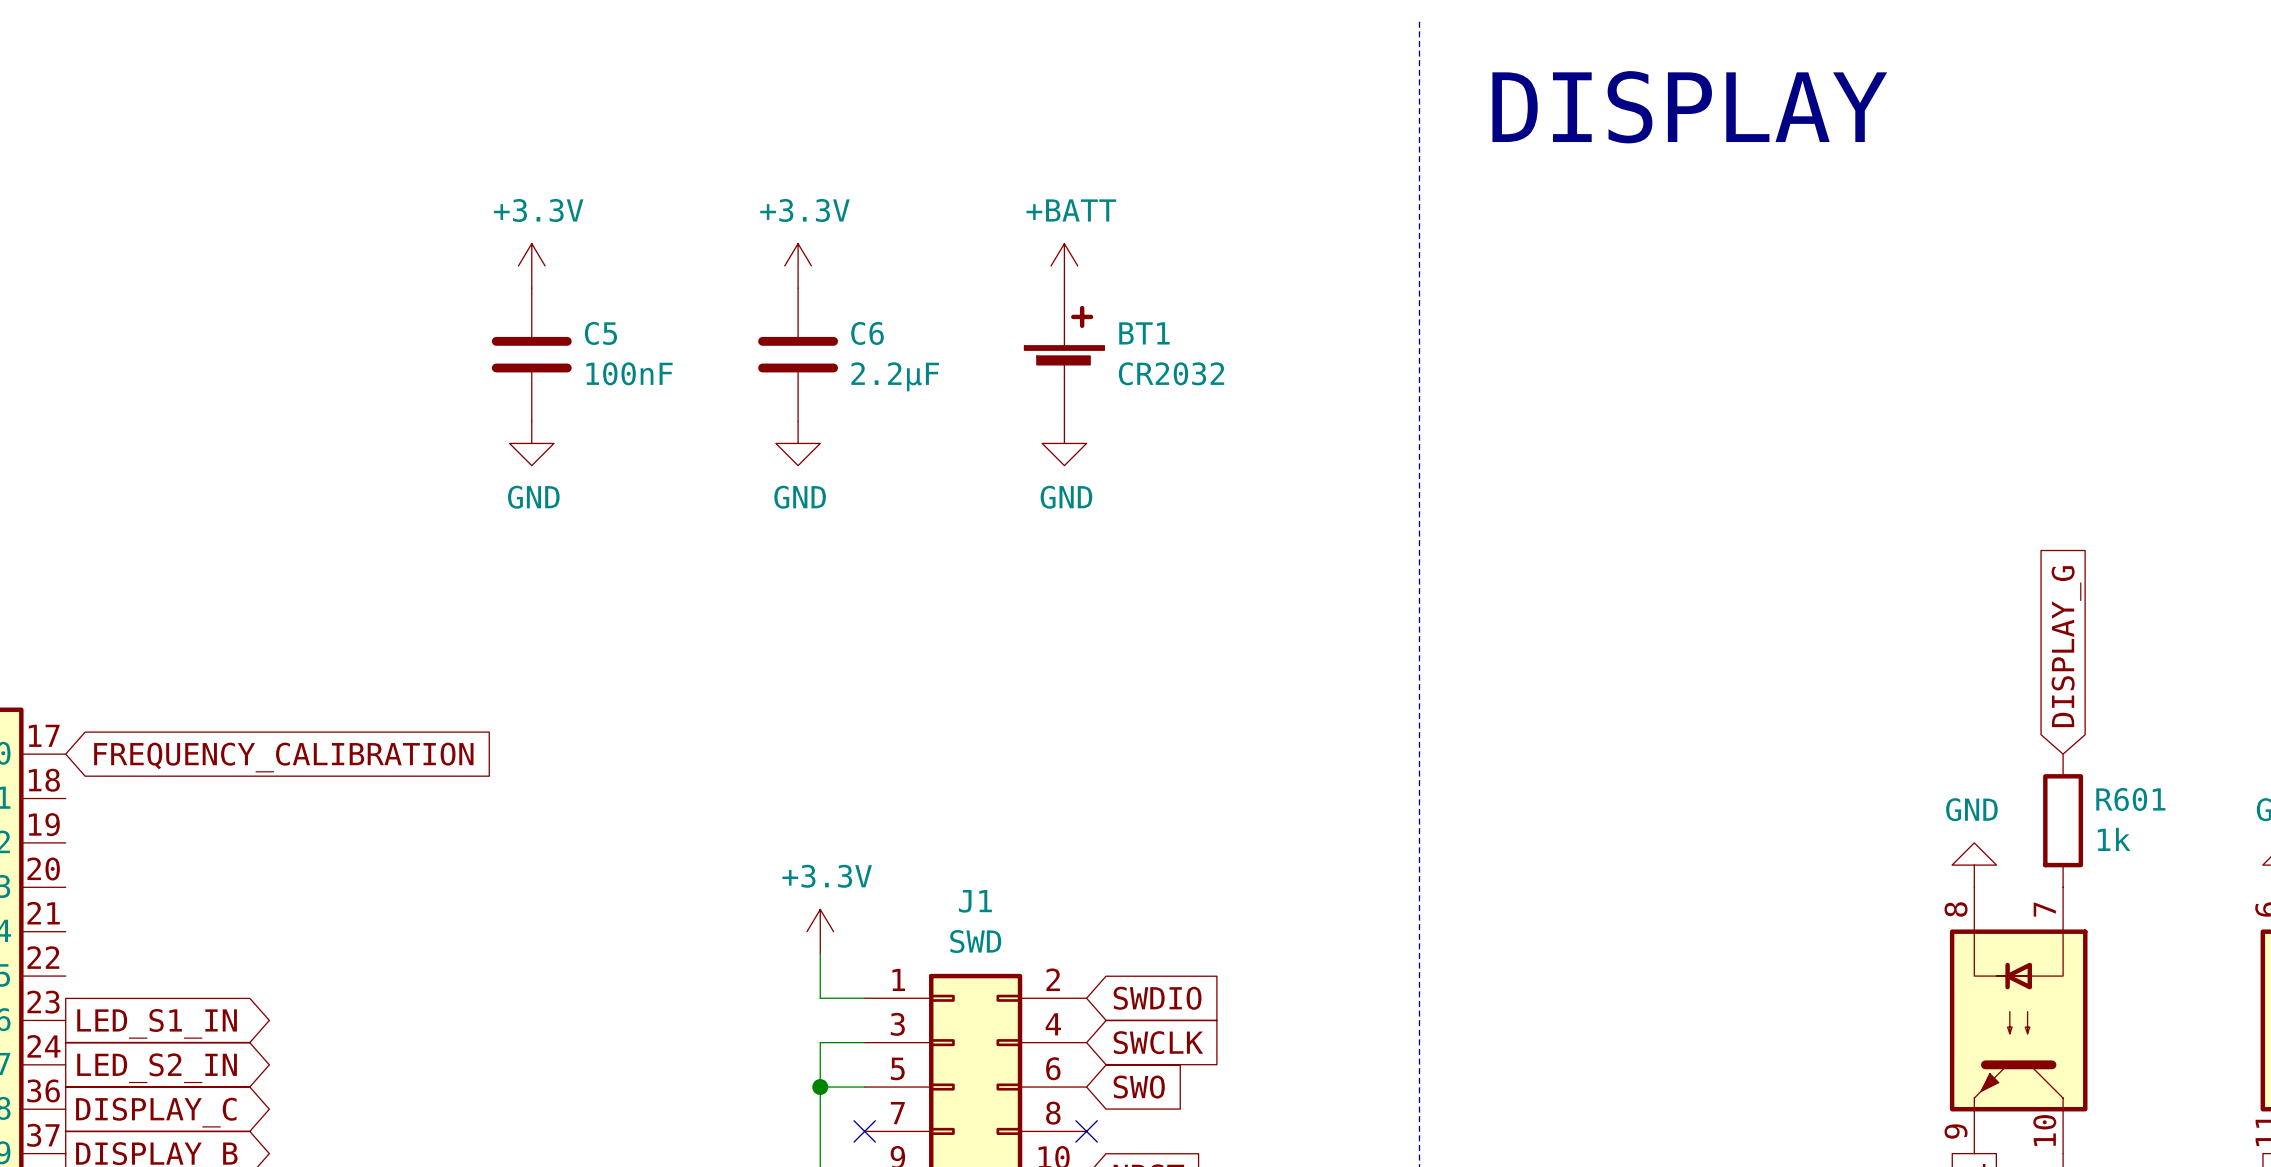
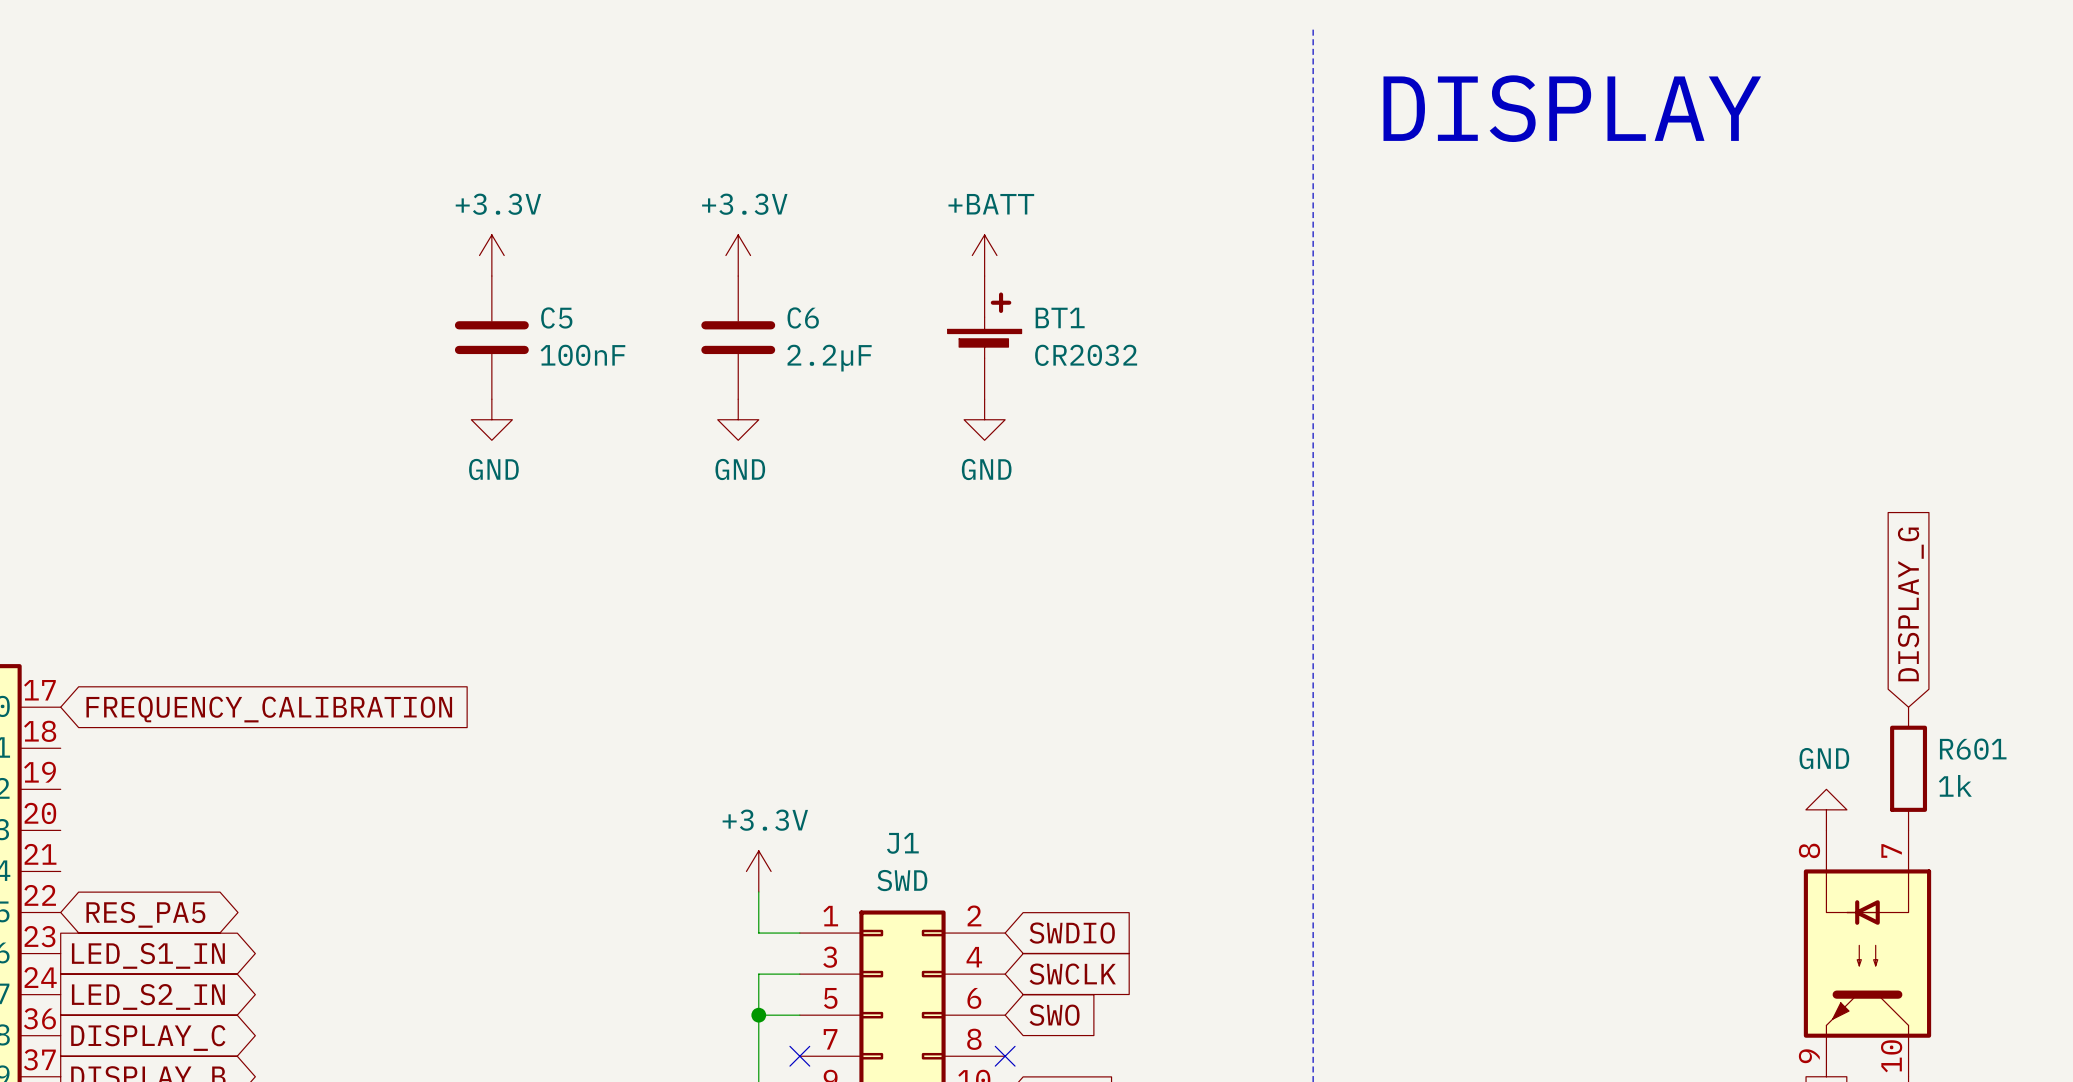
global label: none -> RES_PA5 (145, 914)

